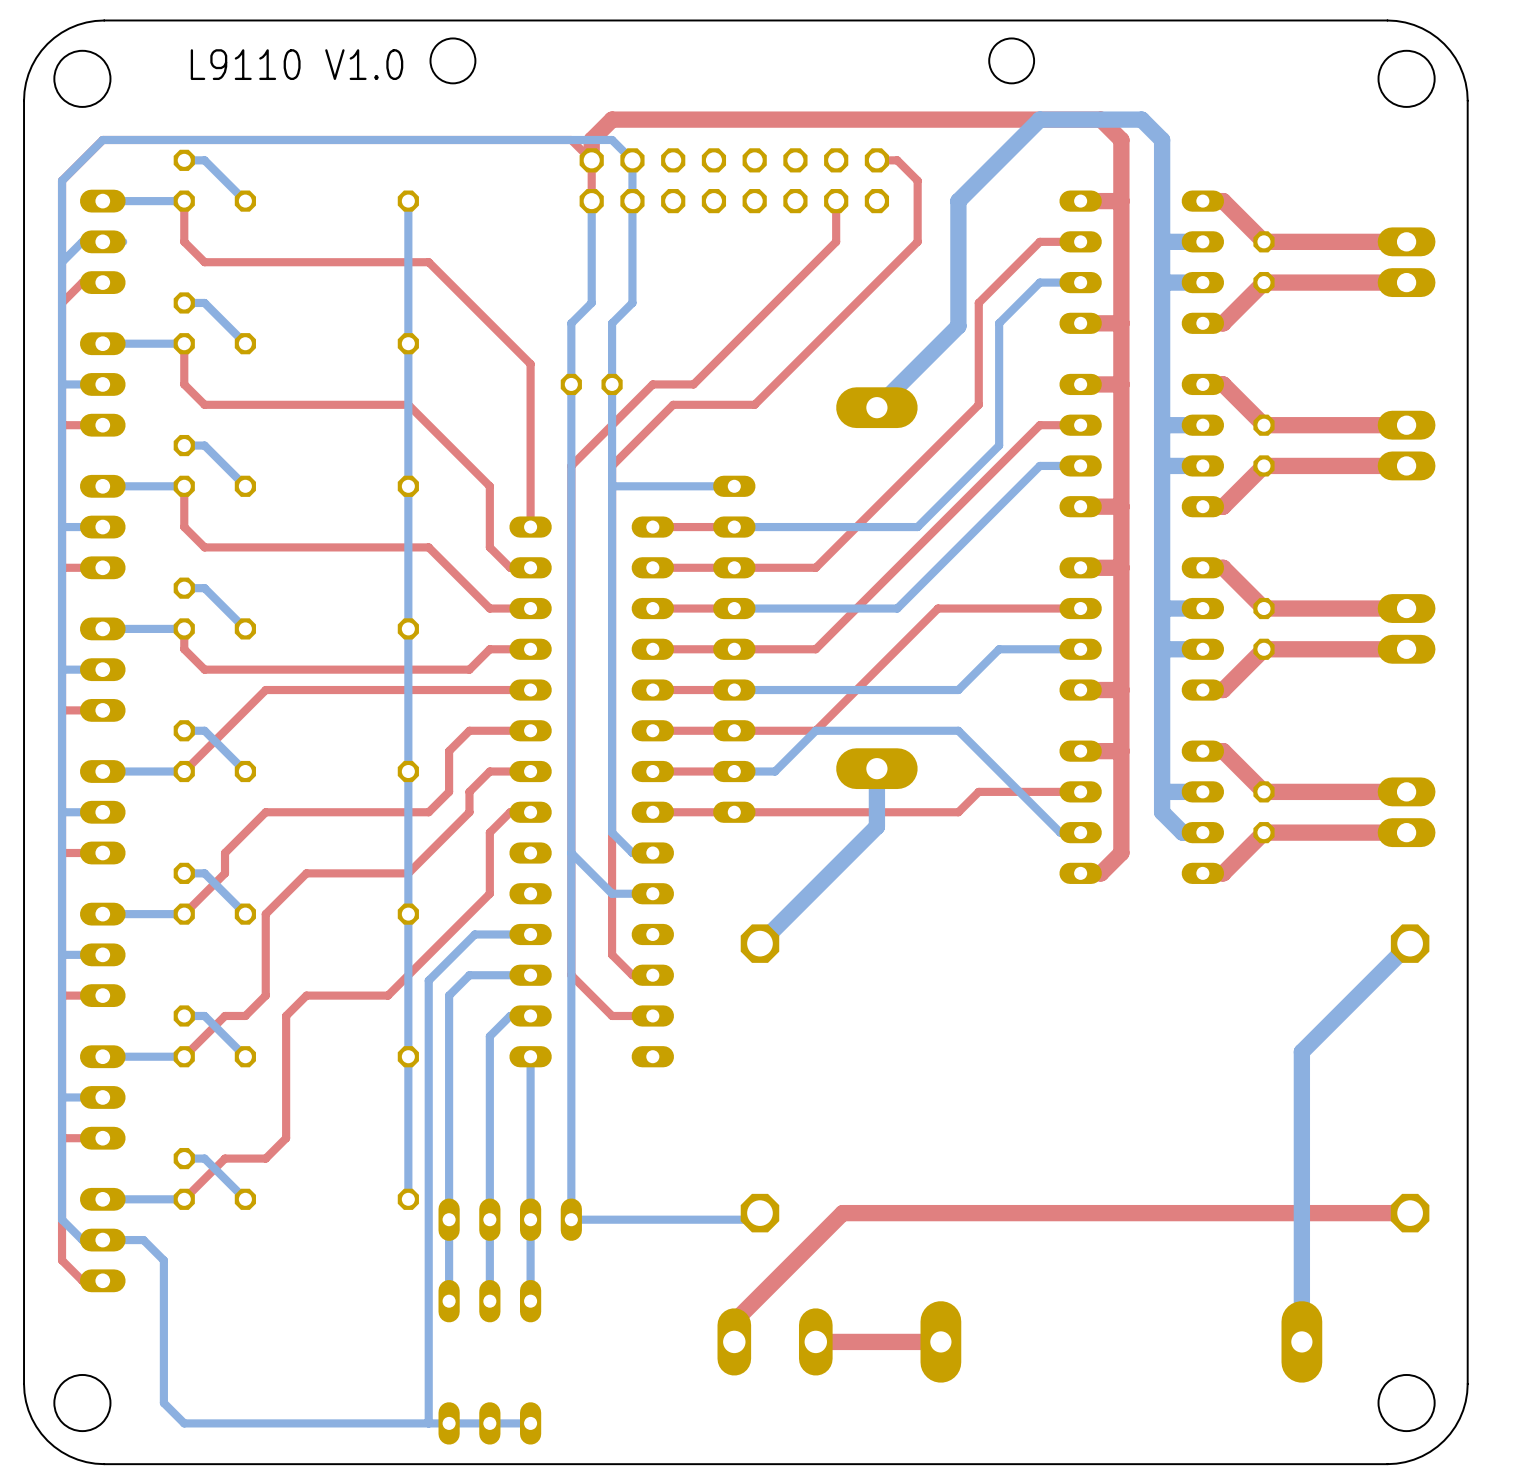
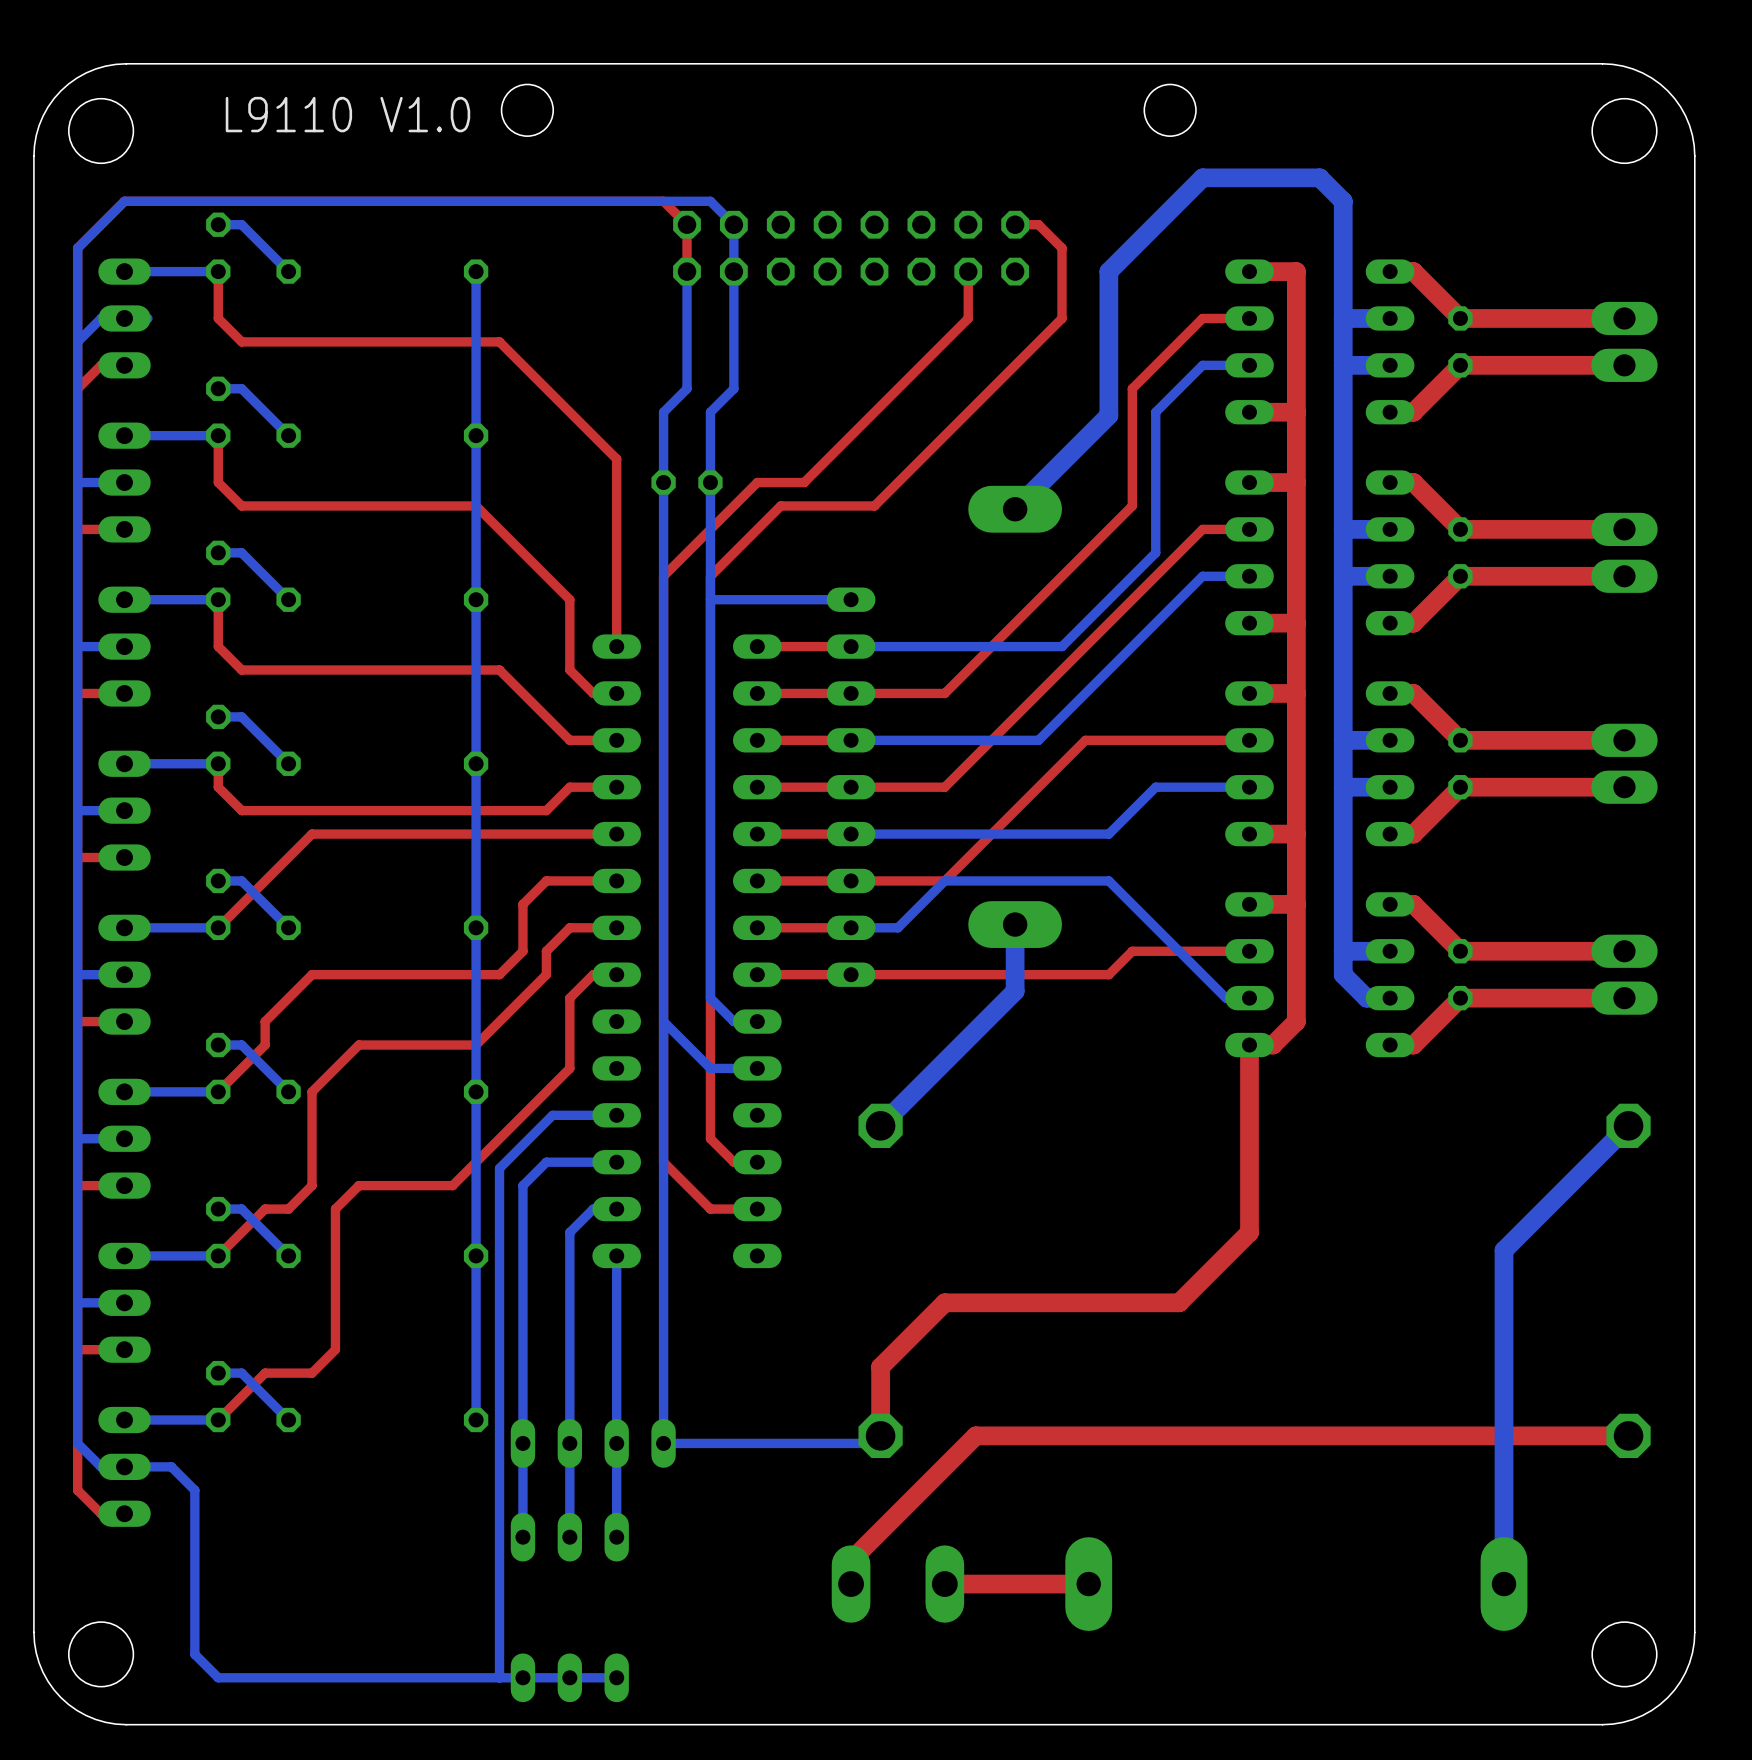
top track: (591, 160) (591, 139) (612, 119) (1101, 119) (1121, 139) (1121, 201) -> none
top track: none -> (1249, 1045) (1249, 1232) (1179, 1302) (944, 1302) (880, 1367) (880, 1435)

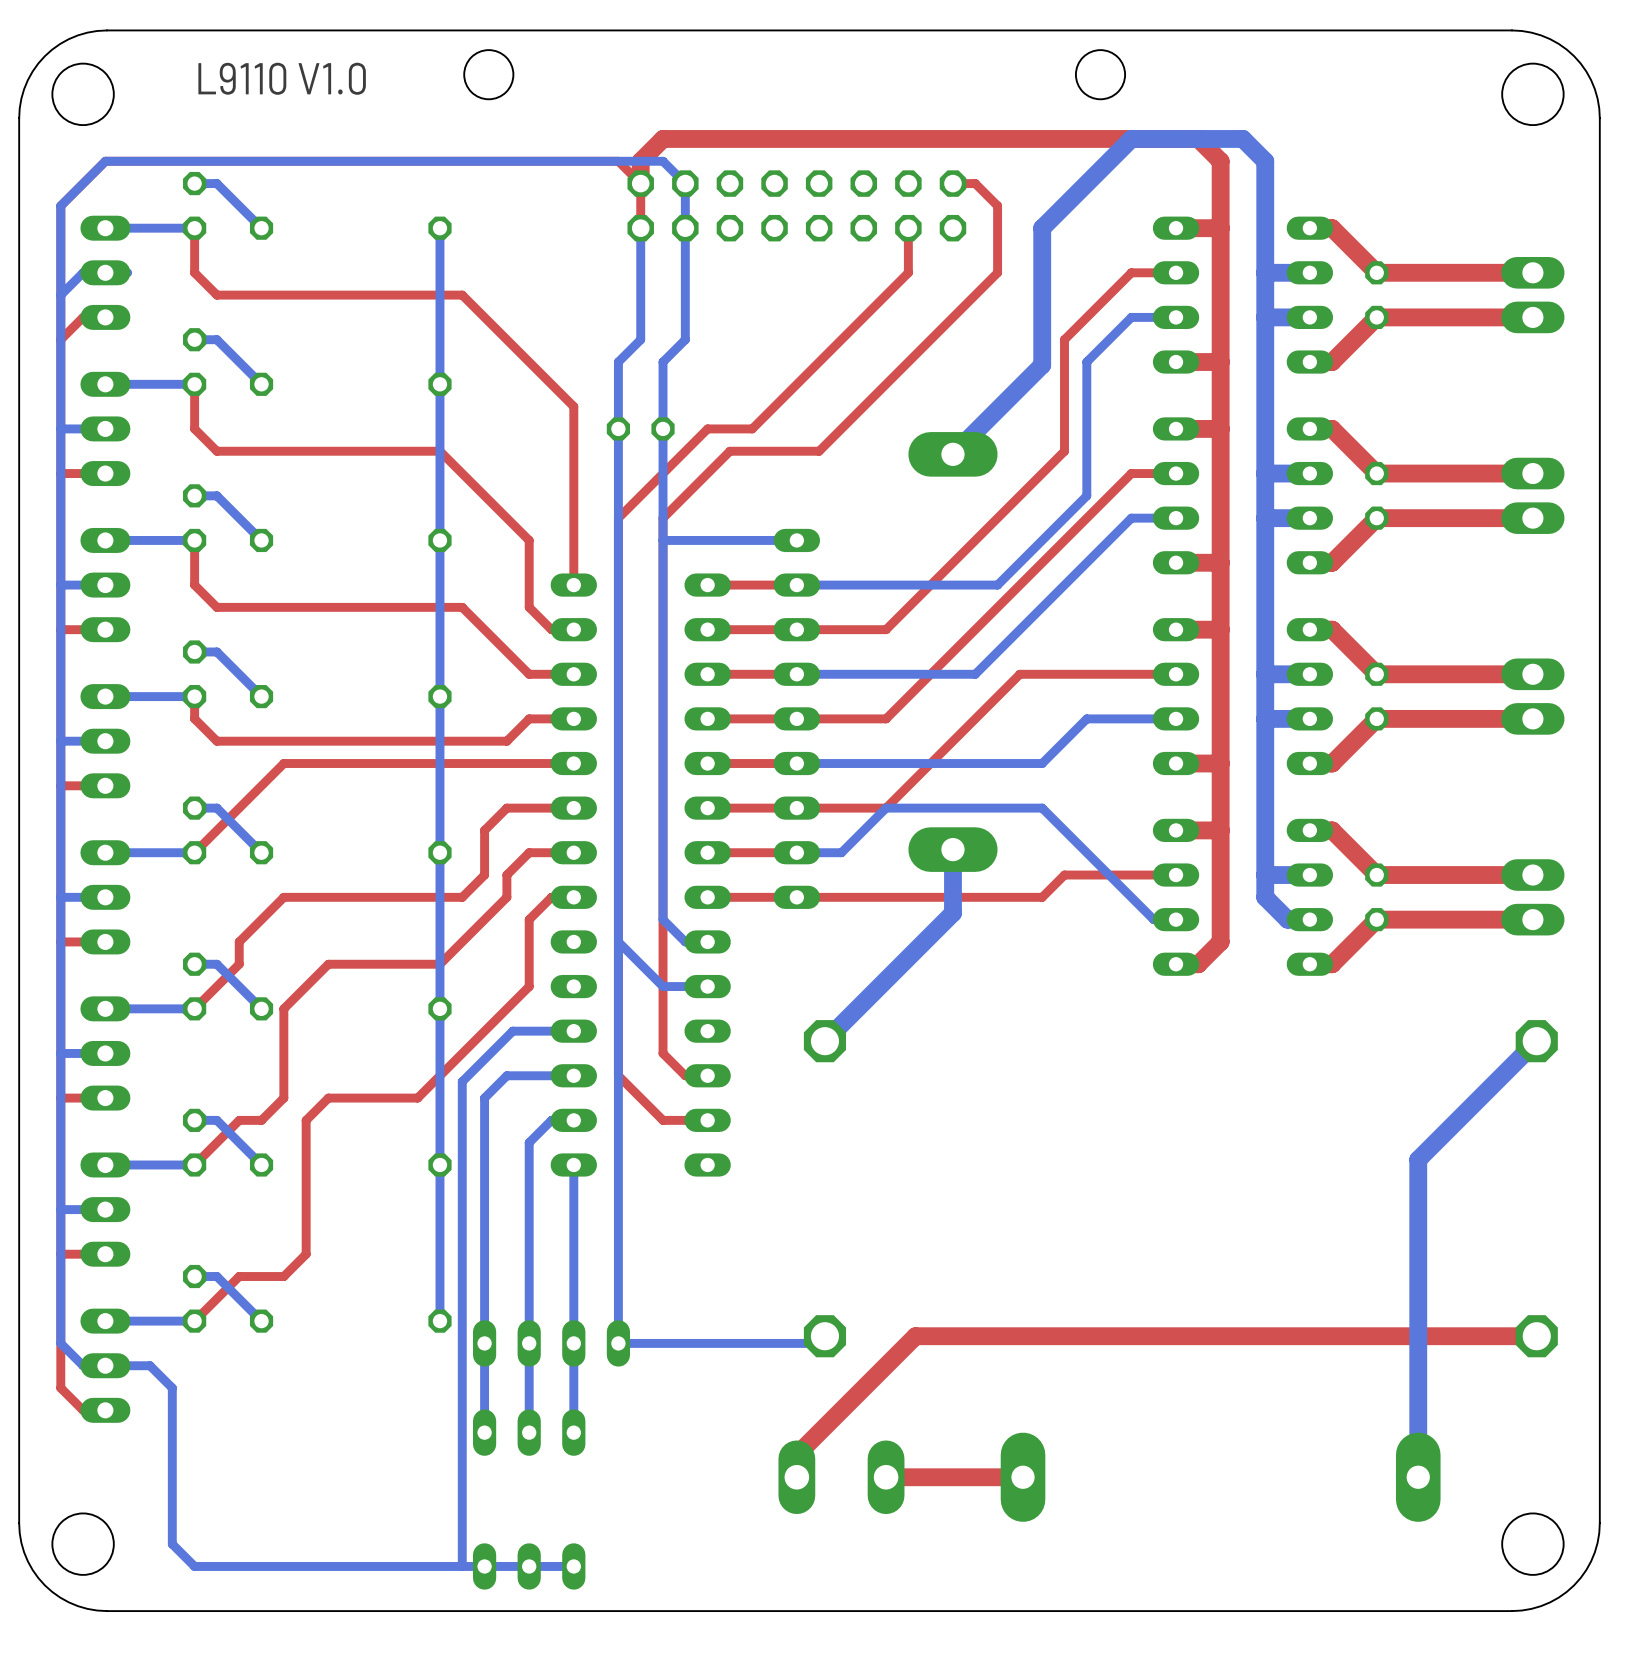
top track: none -> (640, 183) (640, 161) (663, 138) (1198, 138) (1220, 161) (1220, 228)
top track: (1249, 1045) (1249, 1232) (1179, 1302) (944, 1302) (880, 1367) (880, 1435) -> none

